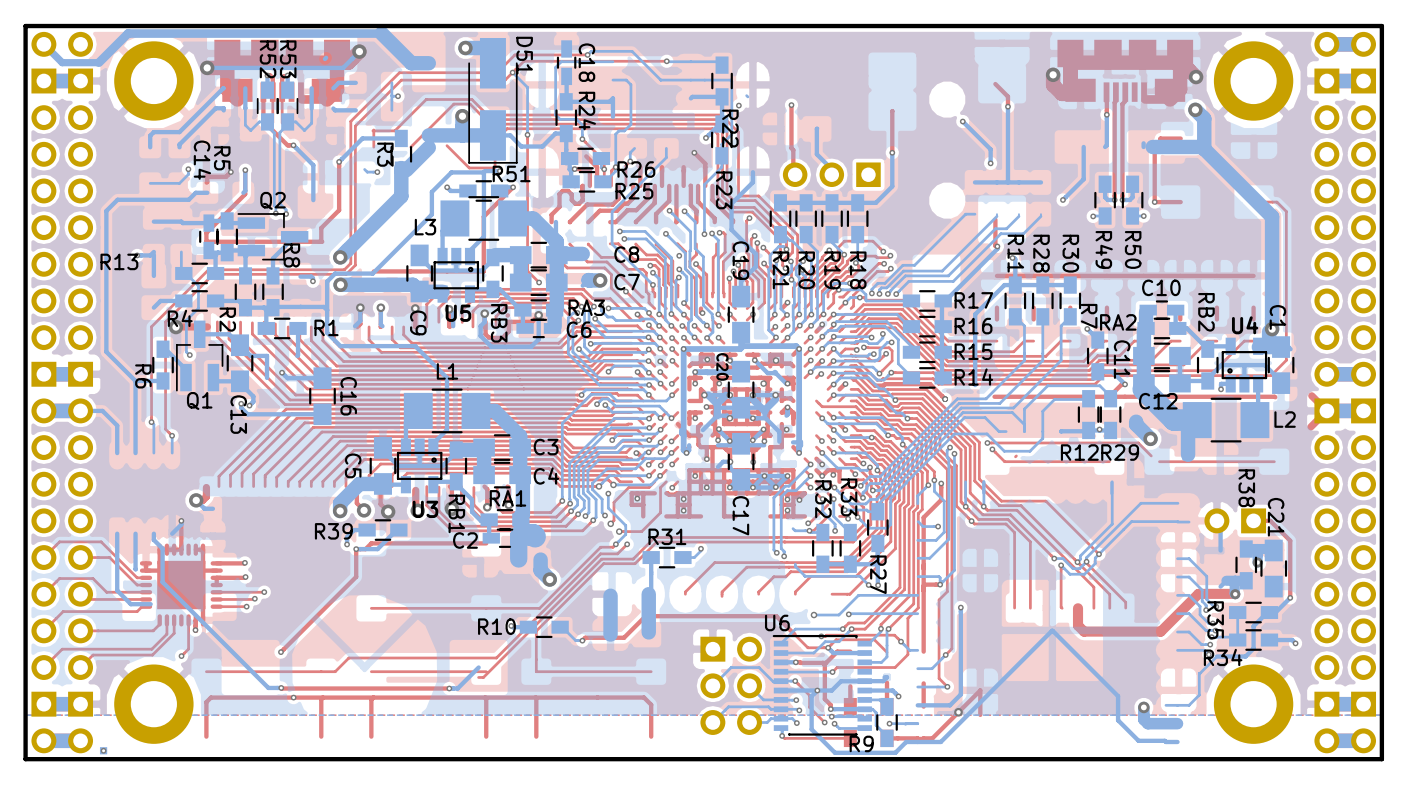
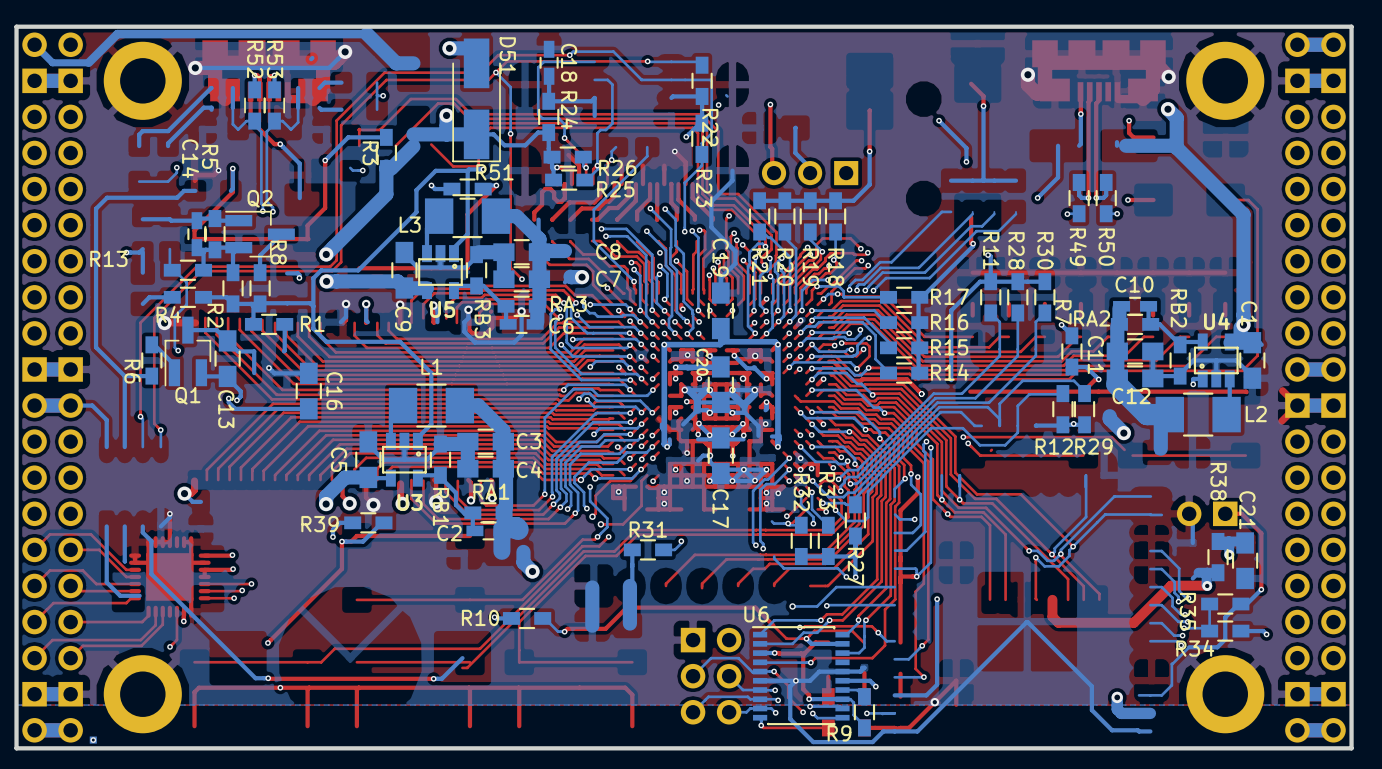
via: none -> (1129, 120)
top track: (1160, 138) (1154, 146) (1154, 202) -> (1133, 137) (1129, 132) (1129, 120)

